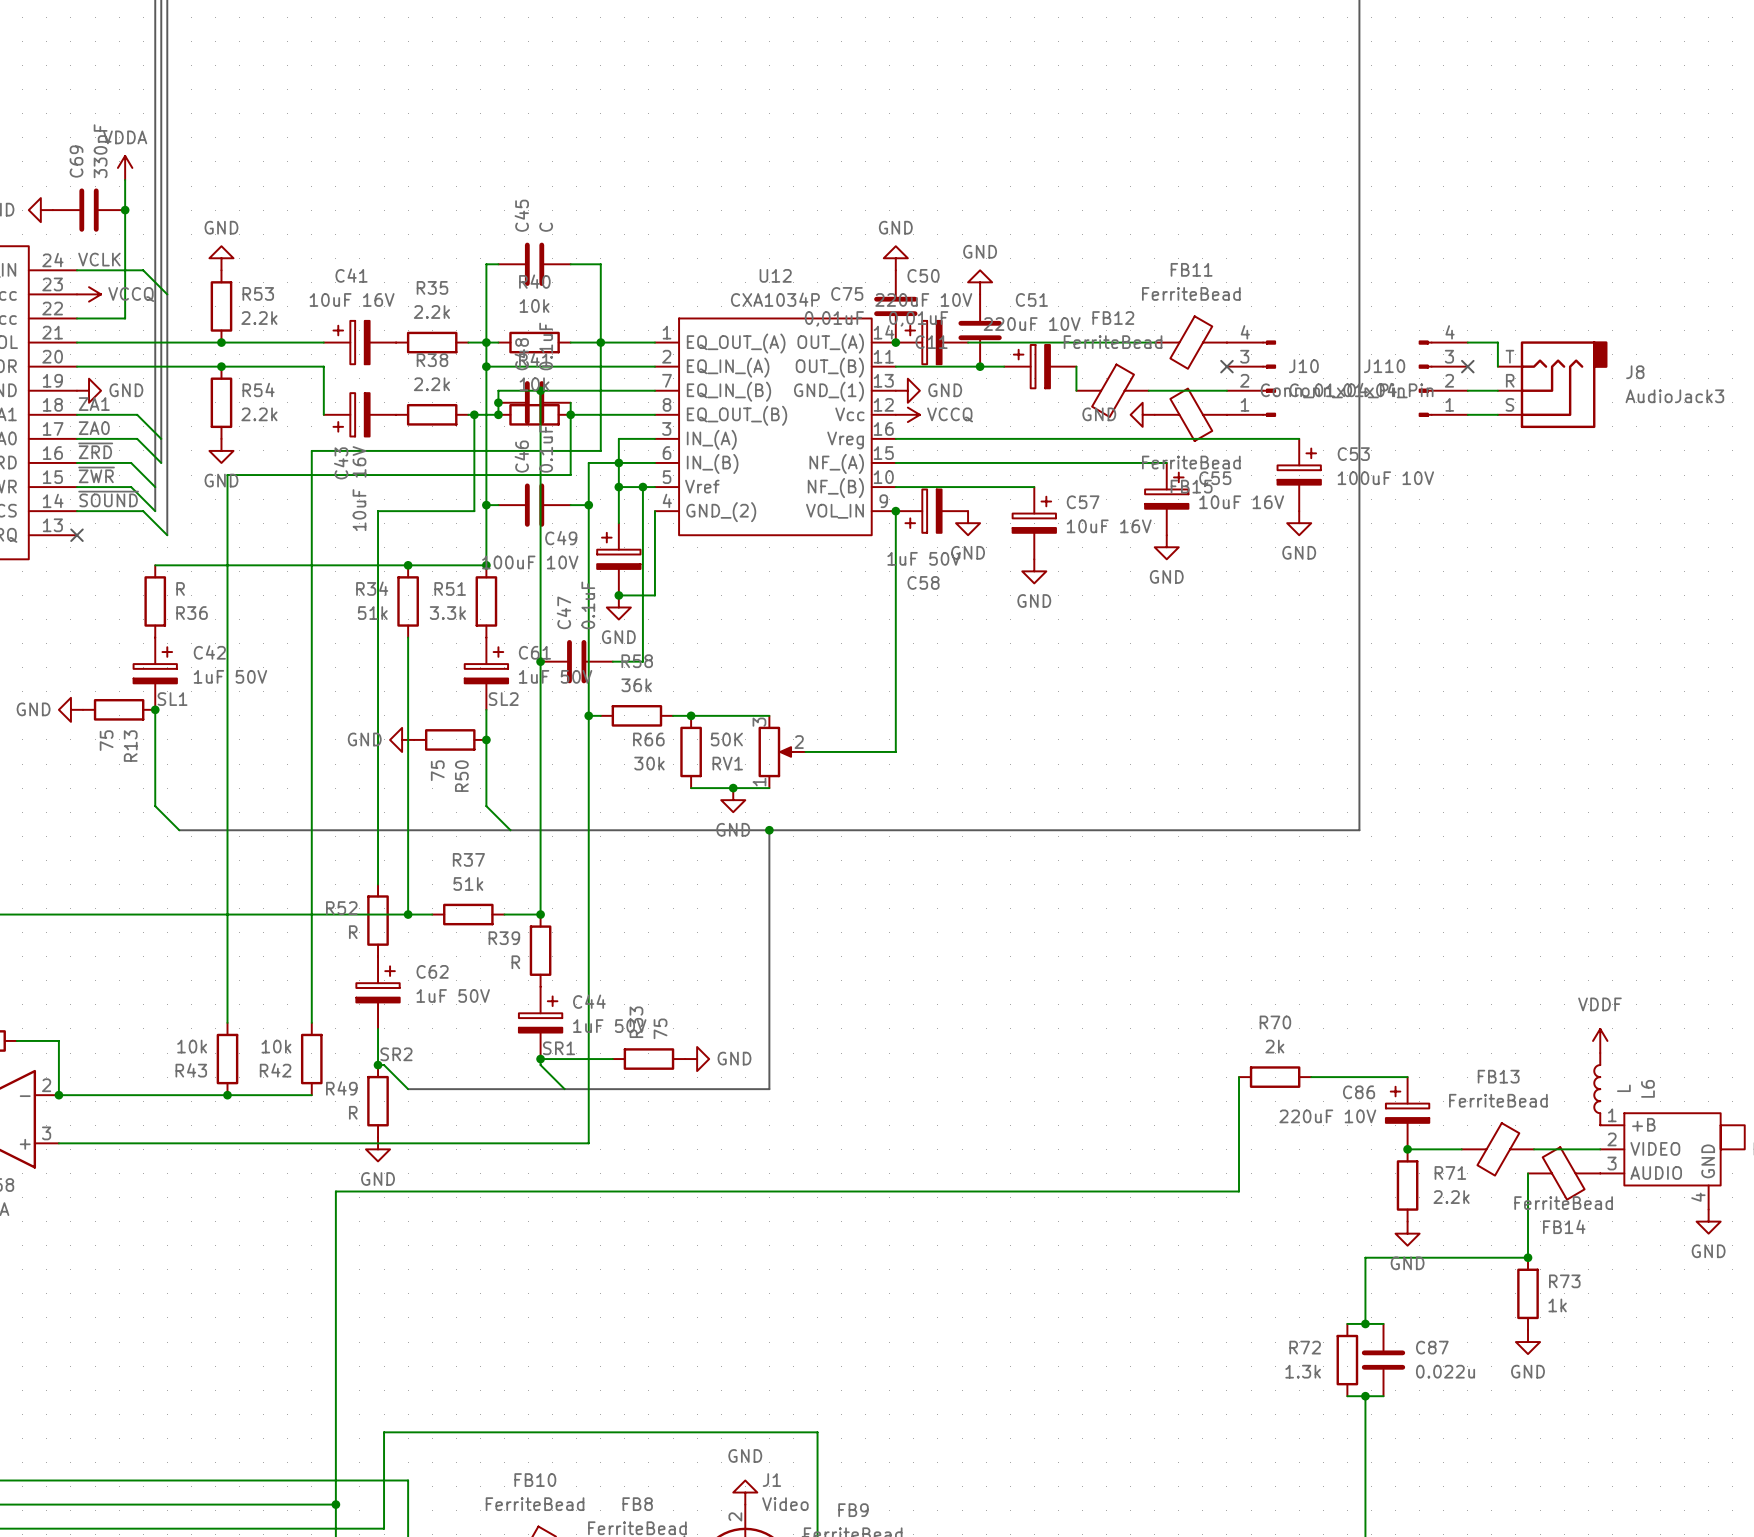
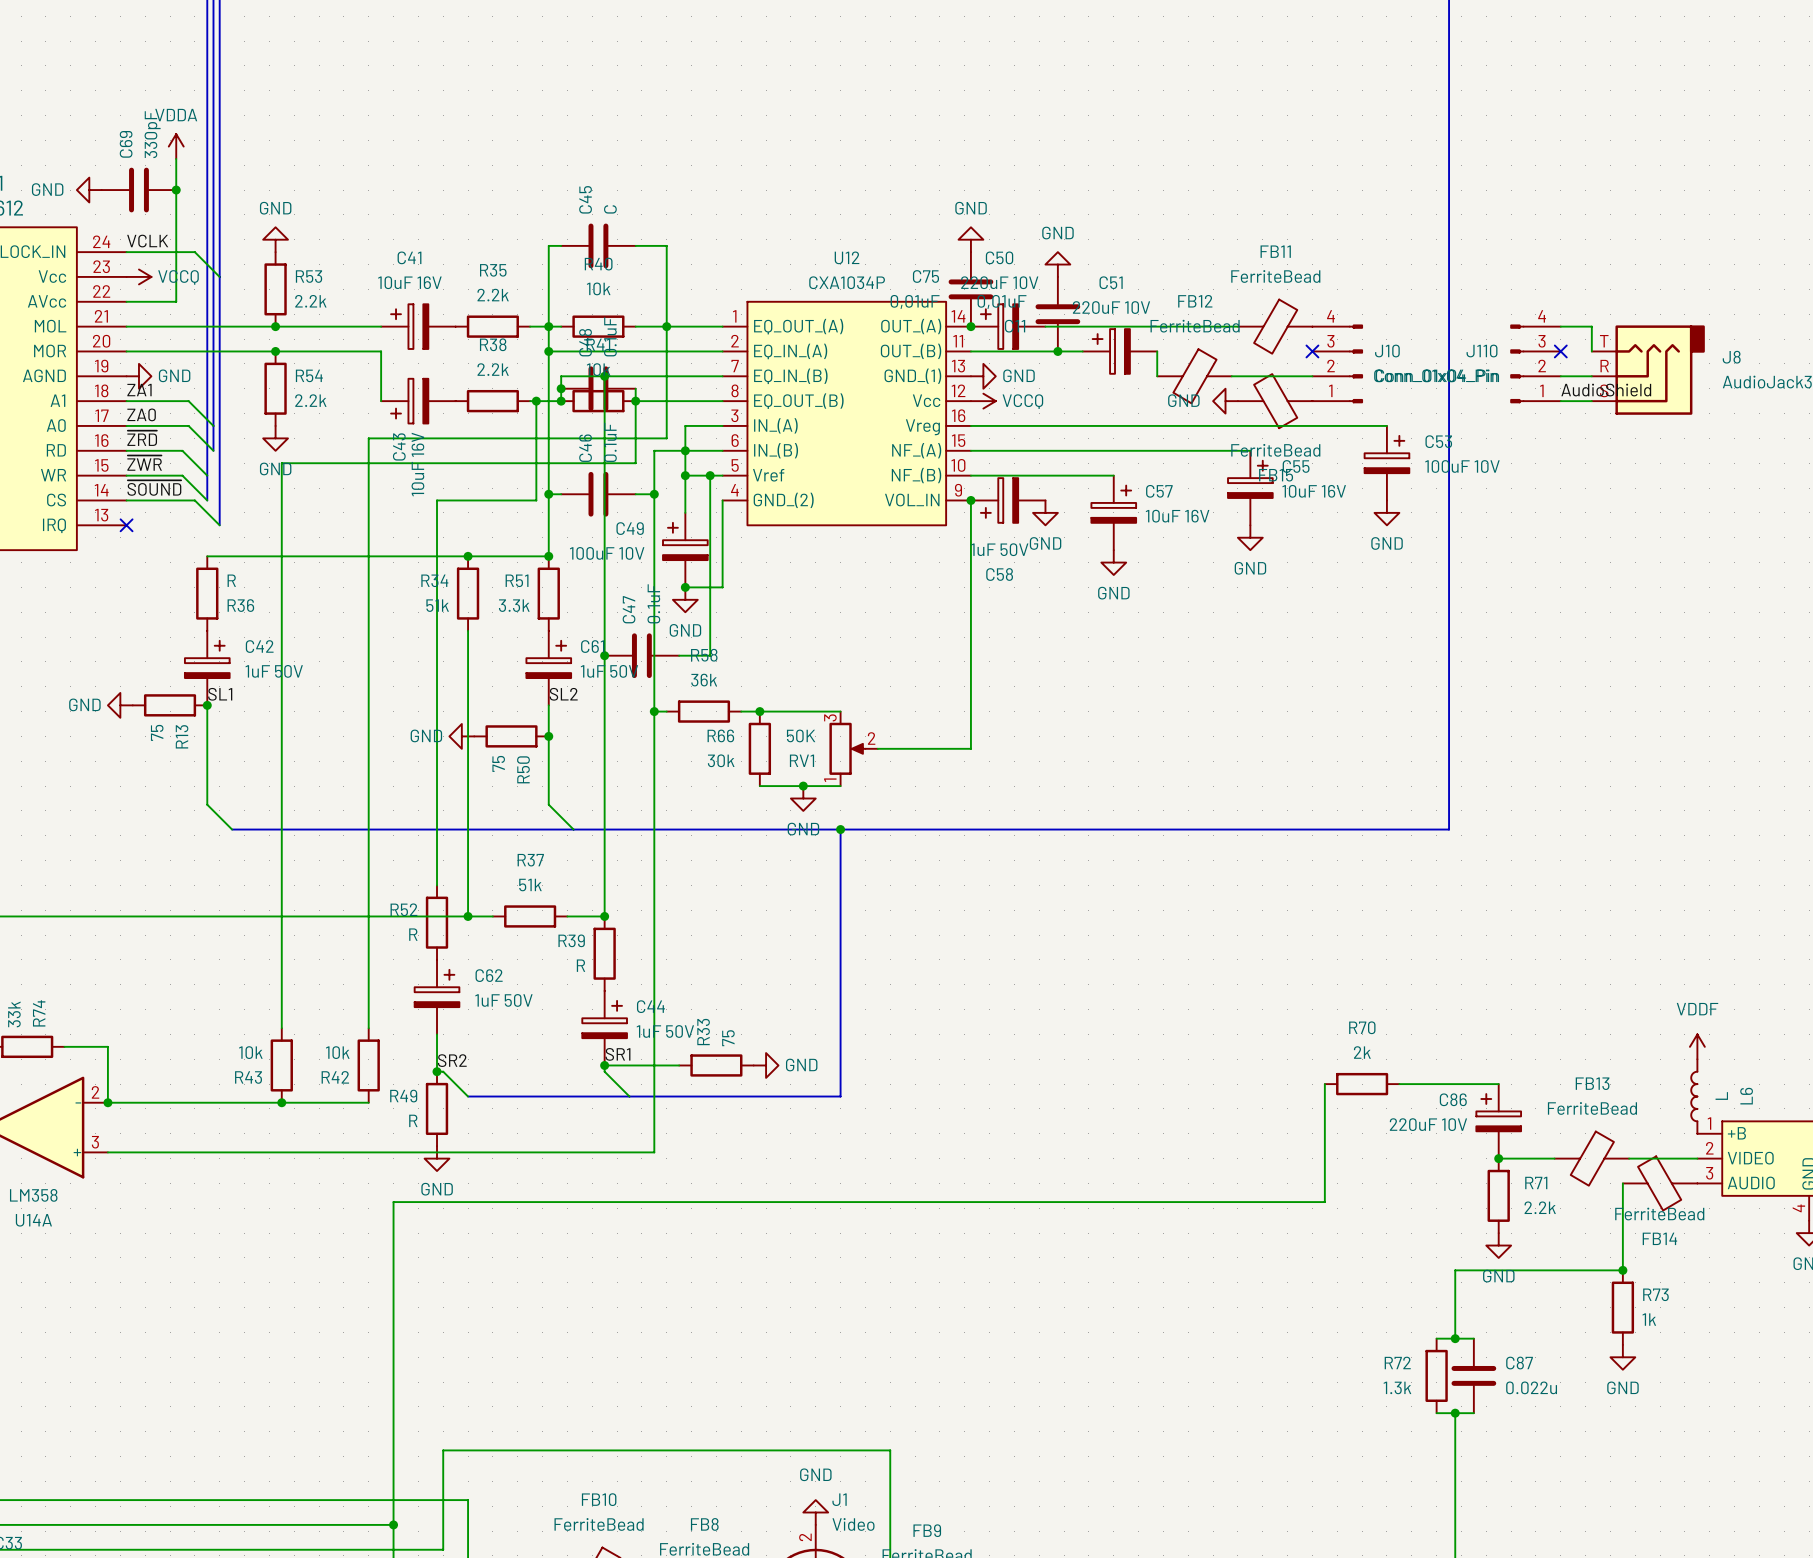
label: none -> AudioShield (1606, 390)

